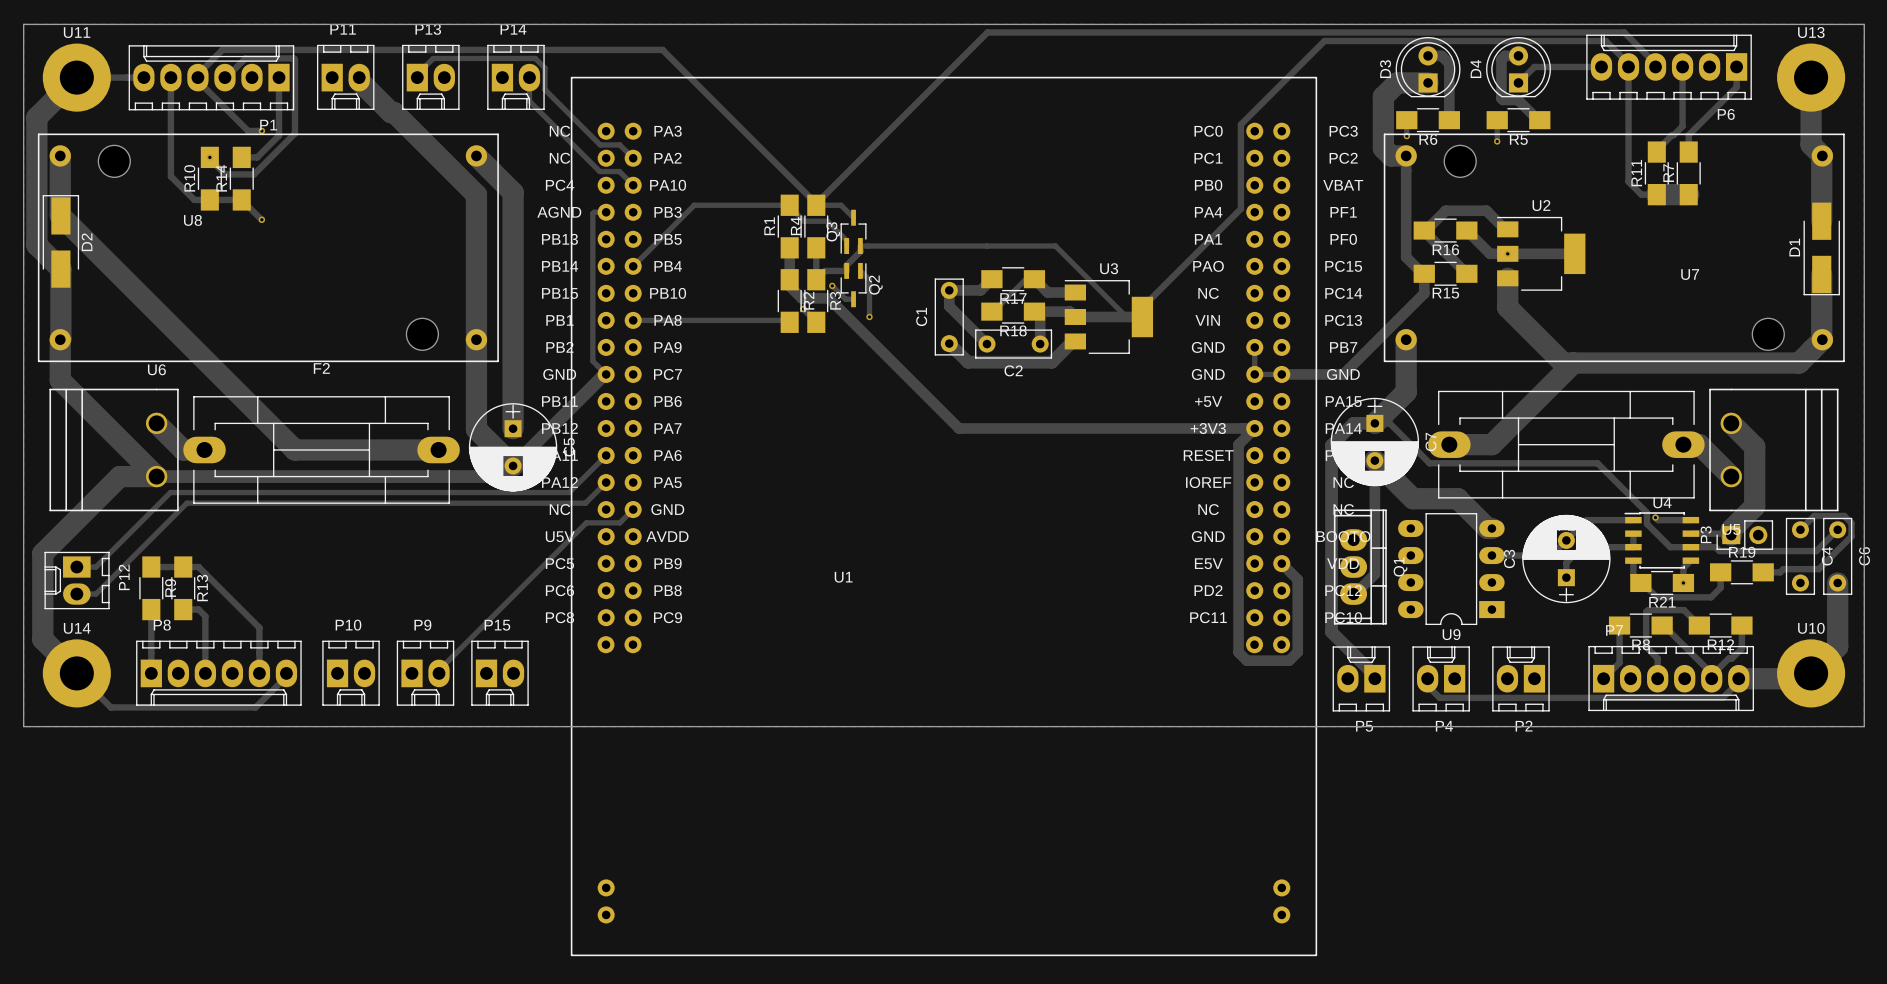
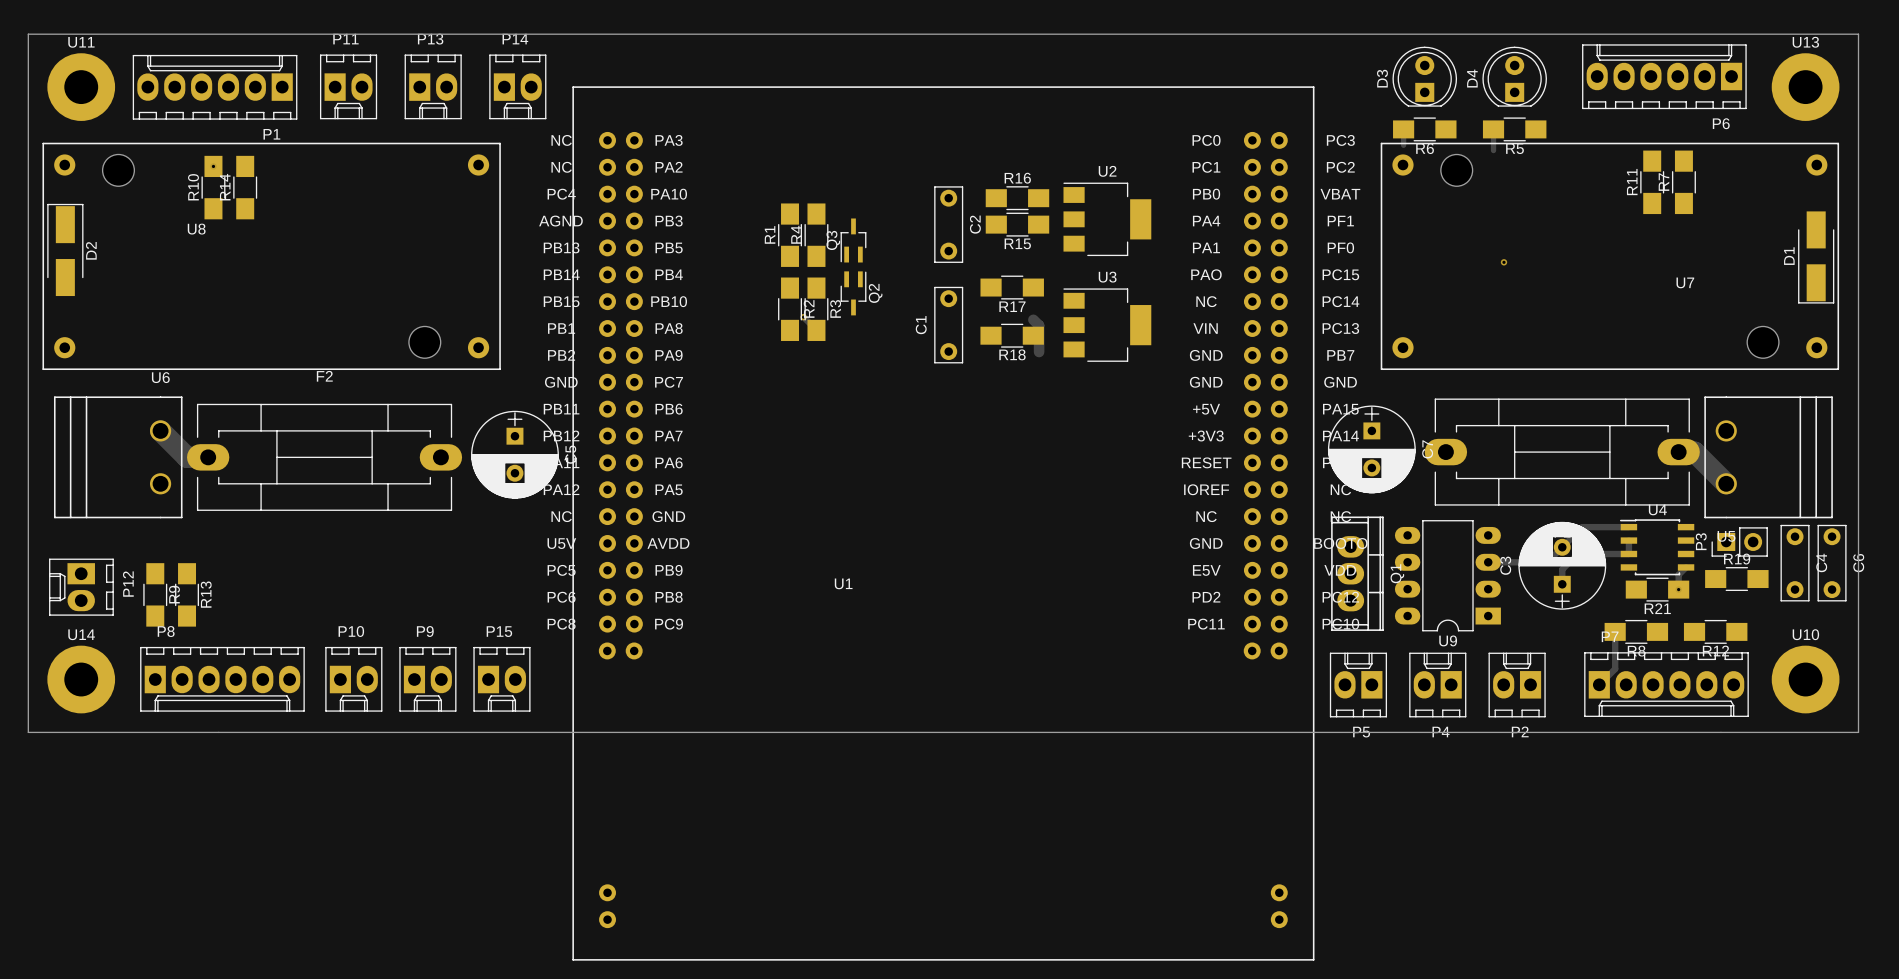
track: (1428, 55) (1441, 55) (1449, 63) (1449, 120) -> none
track: (1518, 55) (1504, 55) (1501, 59) (1501, 98) (1517, 99) (1539, 120) -> none
track: (1601, 66) (1534, 66) (1518, 82) -> none
track: (1655, 66) (1655, 63) (1624, 32) (987, 32) (816, 203) -> none
track: (1682, 66) (1682, 126) (1656, 152) -> none
track: (1736, 66) (1736, 87) (1688, 135) (1688, 152) -> none
track: (143, 77) (76, 77) (36, 117) (36, 245) (60, 269) (60, 380) (156, 476) -> none
track: (170, 77) (170, 176) (194, 199) (241, 199) (261, 219) -> none
track: (224, 77) (245, 58) (293, 58) (294, 133) (254, 174) (225, 174) (209, 157) -> none
track: (279, 77) (279, 135) (257, 157) (241, 157) -> none
track: (359, 77) (359, 80) (391, 112) (394, 112) (476, 194) (476, 429) (513, 465) -> none
track: (417, 77) (417, 74) (433, 58) (535, 58) (544, 68) (544, 89) (600, 144) (619, 144) (633, 158) -> none
track: (529, 77) (529, 101) (599, 171) (619, 171) (633, 185) -> none
track: (1811, 77) (1811, 144) (1822, 155) (1821, 221) -> none
track: (1428, 82) (1397, 82) (1383, 96) (1383, 148) (1391, 155) (1406, 155) (1406, 257) (1424, 273) (1424, 293) (1343, 374) (1254, 374) (1254, 347) -> none
track: (261, 130) (248, 130) (197, 80) (197, 74) (222, 49) (662, 49) (816, 203) -> none
via: (261, 130) -> none
via: (1406, 136) -> none
via: (1497, 141) -> none
track: (60, 155) (60, 215) (294, 449) (438, 449) -> none
track: (476, 155) (513, 192) (513, 428) -> none
track: (1688, 194) (1641, 194) (1628, 181) (1628, 63) (1605, 41) (1324, 41) (1240, 124) (1240, 208) (1142, 307) (1142, 316) -> none
track: (816, 203) (816, 205) (841, 205) (853, 217) -> none
track: (606, 212) (592, 213) (592, 361) (606, 374) (502, 476) (156, 476) -> none
via: (261, 219) -> none
track: (1507, 229) (1505, 229) (1486, 210) (1445, 210) (1424, 230) (1466, 273) -> none
R16 position: (1445, 230) -> (1017, 198)
track: (1466, 230) (1490, 253) (1574, 253) -> none
track: (846, 246) (846, 240) (827, 221) (804, 221) (789, 205) (694, 205) (633, 266) -> none
track: (789, 247) (789, 286) (801, 298) (828, 298) (959, 428) (1254, 428) (1238, 444) (1238, 652) (1246, 660) (1289, 660) (1297, 652) (1297, 579) (1281, 563) -> none
track: (816, 247) (816, 279) (825, 270) (846, 270) (846, 265) (860, 251) (860, 246) (1055, 246) (1126, 316) (1142, 316) -> none
R16 name position: R16 (1445, 249) -> R16 (1017, 178)
U2 position: (1541, 253) -> (1107, 219)
track: (860, 270) (869, 279) (869, 316) -> none
R15 position: (1445, 273) -> (1017, 224)
track: (1821, 274) (1822, 339) (1799, 363) (1563, 363) (1507, 307) (1507, 278) -> none
track: (991, 279) (980, 290) (949, 290) (949, 306) (987, 344) -> none
track: (832, 285) (845, 299) (853, 299) -> none
via: (832, 285) -> none
track: (1075, 292) (1047, 292) (1034, 279) (1025, 279) (991, 311) -> none
R18 position: (1013, 311) -> (1012, 335)
track: (1032, 311) (1070, 311) (1075, 316) (1142, 316) -> none
via: (869, 316) -> none
track: (633, 320) (787, 320) (789, 322) -> none
track: (1406, 339) (1406, 392) (1374, 423) -> none
track: (1075, 341) (1072, 341) (1051, 362) (967, 362) (949, 343) -> none
C2 rotation: 0° (1013, 344) -> 90° clockwise (948, 224)
C2 position: (1013, 344) -> (948, 224)
track: (1573, 363) (1491, 444) (1449, 444) -> none
C2 name position: C2 (1013, 370) -> C2 (975, 224)
track: (1374, 423) (1353, 423) (1331, 445) (1331, 632) (1374, 675) (1374, 678) -> none
track: (1374, 423) (1389, 423) (1429, 463) (1597, 463) (1646, 512) (1646, 523) (1670, 547) (1715, 547) (1719, 551) (1816, 551) (1837, 529) -> none
track: (1731, 423) (1754, 446) (1754, 506) (1731, 529) (1731, 535) (1690, 533) -> none
track: (606, 455) (569, 492) (170, 492) (96, 567) (76, 567) -> none
track: (156, 476) (119, 476) (42, 553) (42, 639) (110, 707) (255, 707) (286, 676) (286, 673) -> none
track: (606, 482) (585, 503) (186, 503) (96, 594) (76, 594) -> none
track: (633, 509) (619, 522) (586, 522) (439, 670) (439, 673) -> none
track: (1655, 517) (1658, 520) (1690, 520) -> none
via: (1655, 517) -> none
track: (1491, 528) (1487, 528) (1457, 498) (1412, 498) (1374, 460) (1374, 574) (1353, 594) -> none
track: (1800, 529) (1814, 515) (1844, 515) (1851, 523) (1851, 536) (1818, 569) (1783, 569) (1780, 572) (1763, 572) -> none
track: (1633, 560) (1633, 575) (1656, 597) (1711, 597) (1720, 587) (1720, 572) -> none
track: (151, 567) (198, 567) (259, 627) (259, 673) -> none
track: (1837, 582) (1837, 646) (1805, 678) (1738, 678) (1738, 681) (1722, 697) (1439, 697) (1427, 685) (1427, 678) -> none
track: (151, 609) (151, 673) -> none
track: (183, 609) (198, 609) (205, 616) (205, 673) -> none
track: (1662, 625) (1711, 673) (1711, 678) -> none
track: (1699, 625) (1683, 610) (1648, 610) (1646, 612) (1646, 647) (1657, 658) (1657, 678) -> none
track: (1741, 625) (1741, 648) (1711, 675) -> none

